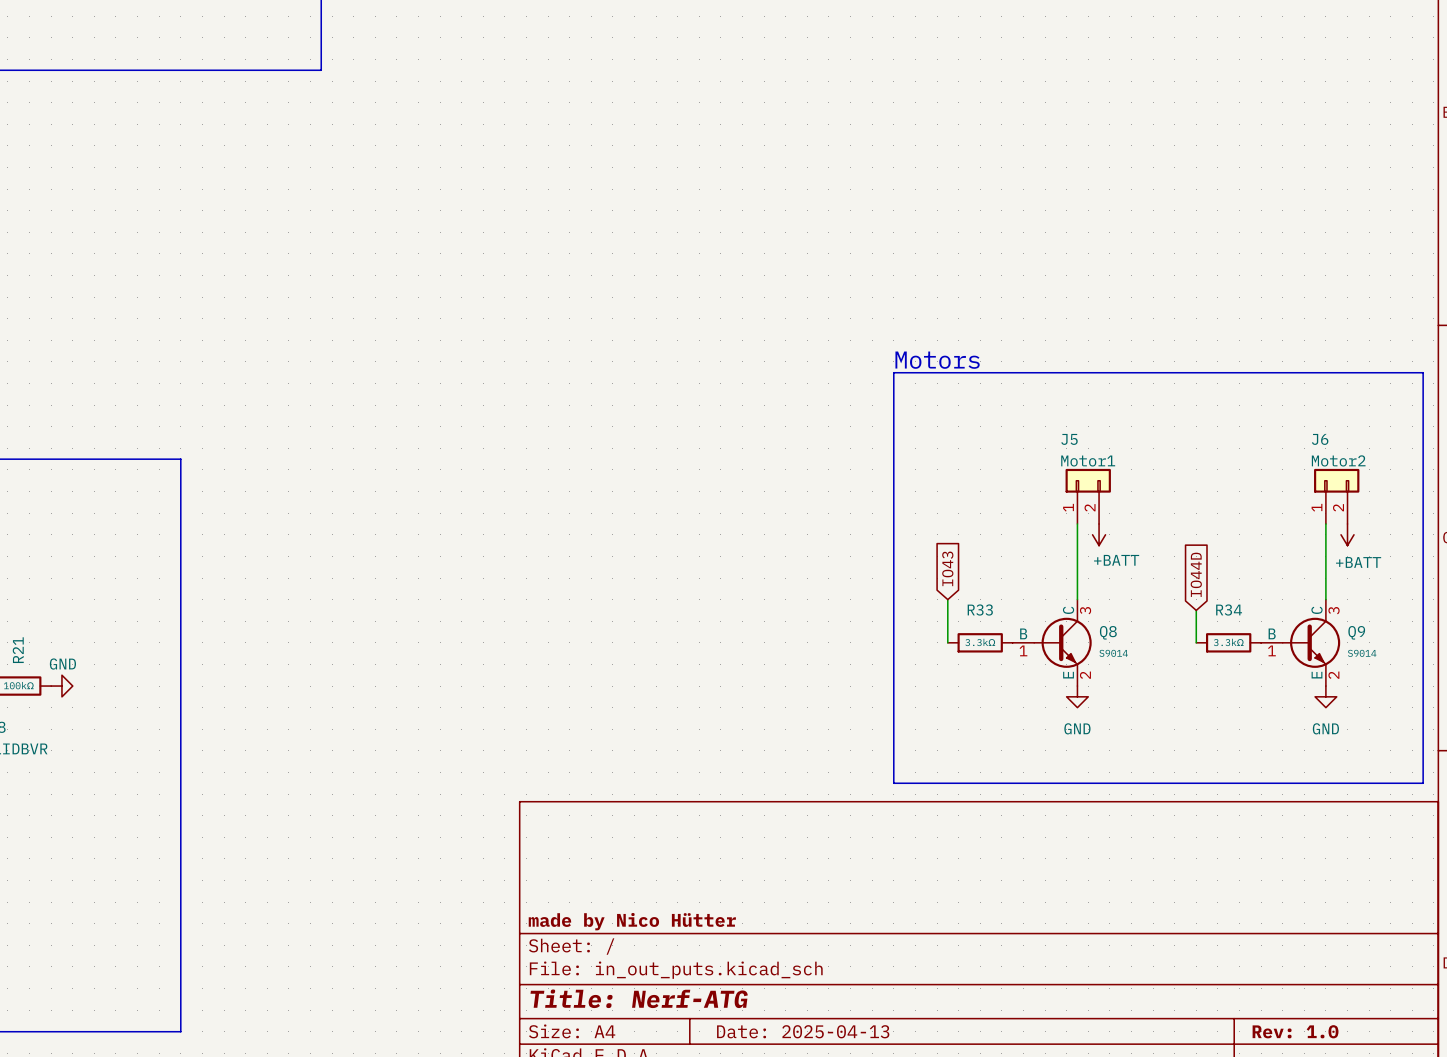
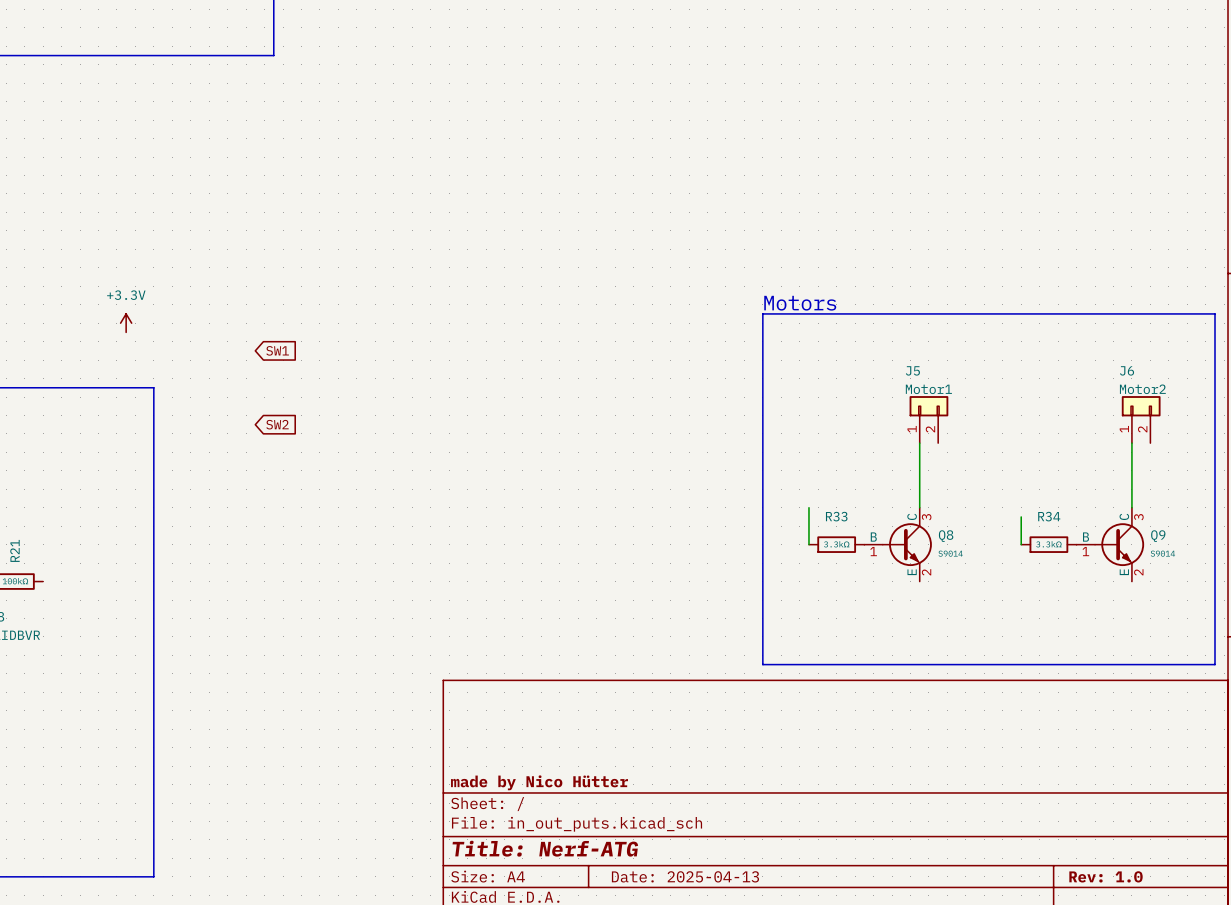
power symbol: none -> +3.3V (126, 323)
global label: none -> SW1 (277, 350)
global label: none -> SW2 (277, 424)
power symbol: +BATT (1099, 534) -> none
power symbol: +BATT (1347, 534) -> none
global label: IO43 (947, 568) -> none
global label: IO44D (1196, 574) -> none
power symbol: GND (61, 686) -> none
power symbol: GND (1077, 696) -> none
power symbol: GND (1325, 696) -> none

